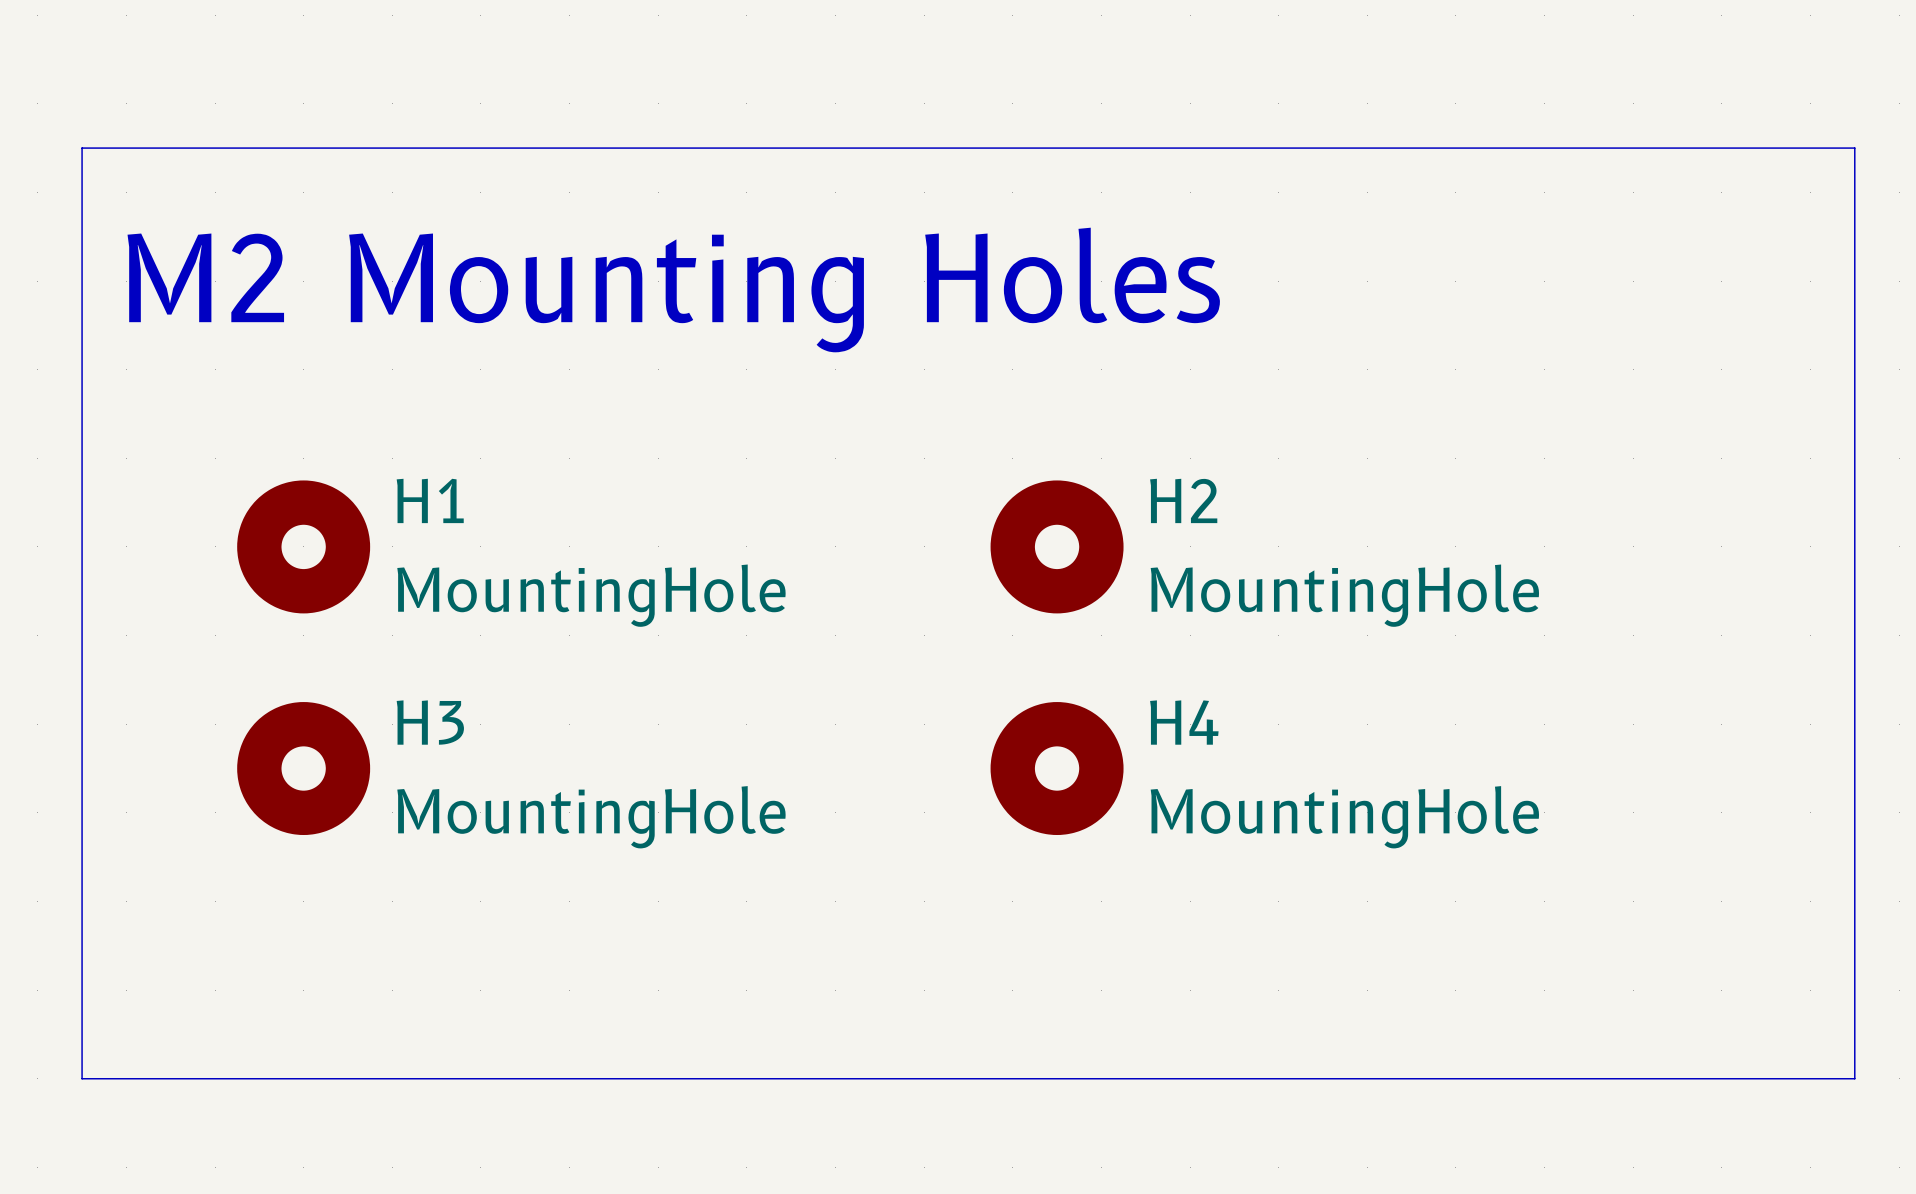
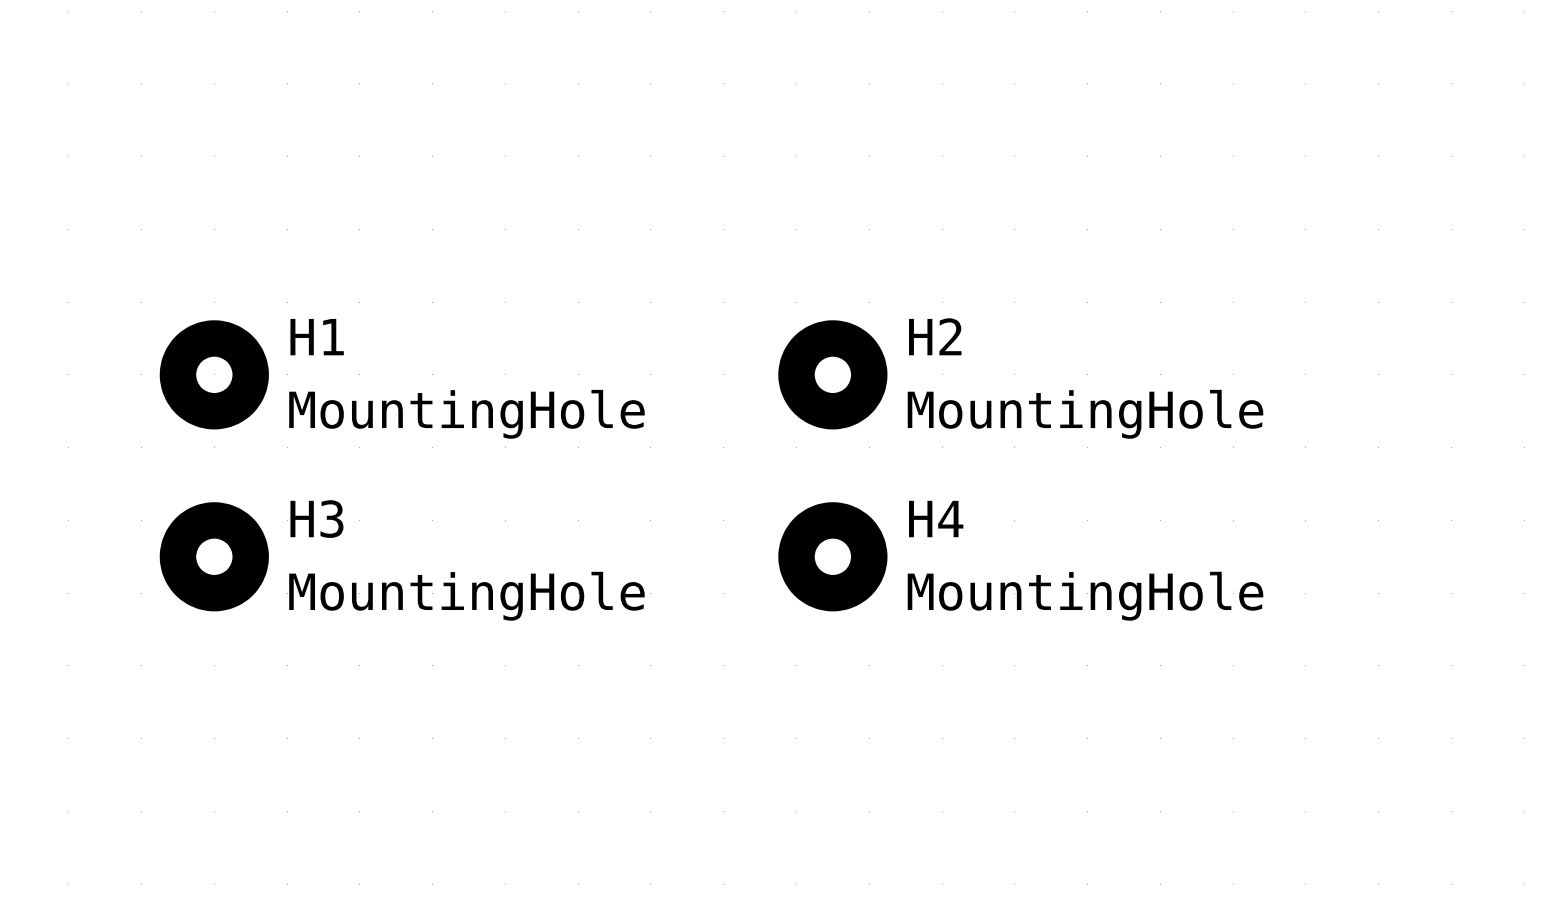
line: (82, 148) (1854, 148) (1854, 1078) (82, 1078) (82, 148) -> none
text: M2 Mounting Holes (673, 290) -> none

